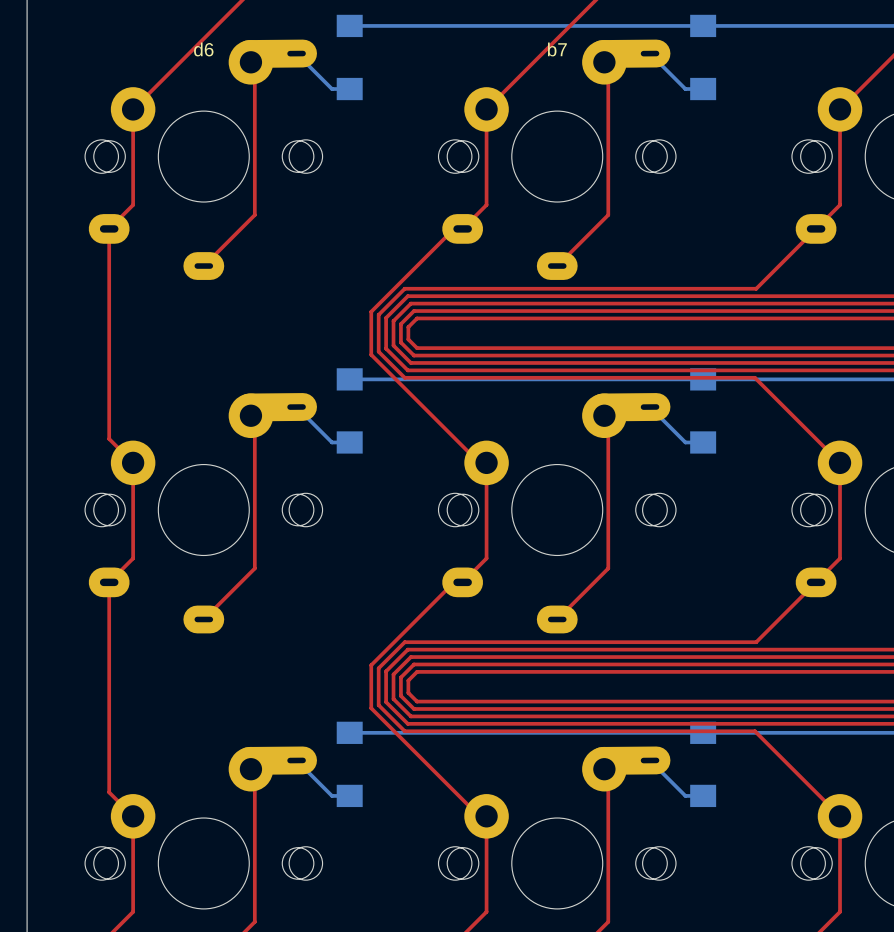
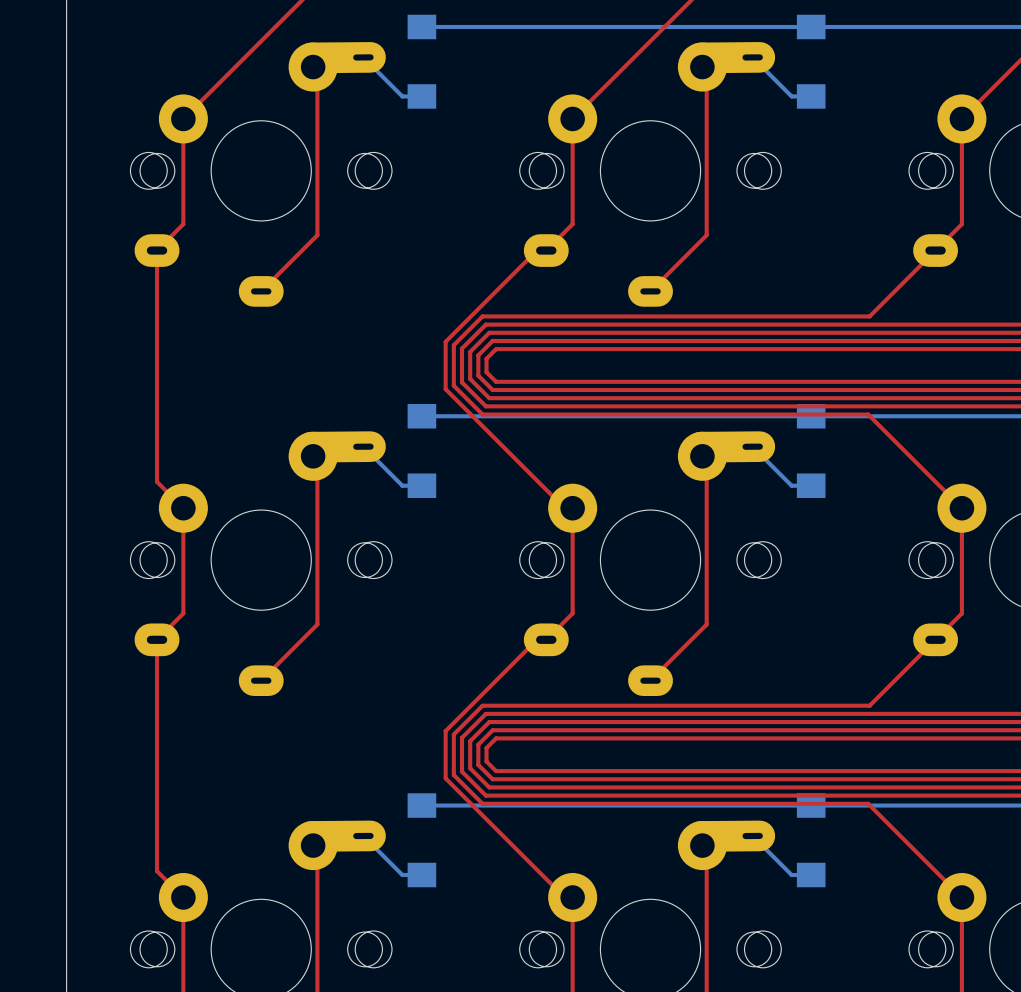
text: d6 (203, 49) -> none
text: b7 (557, 49) -> none

